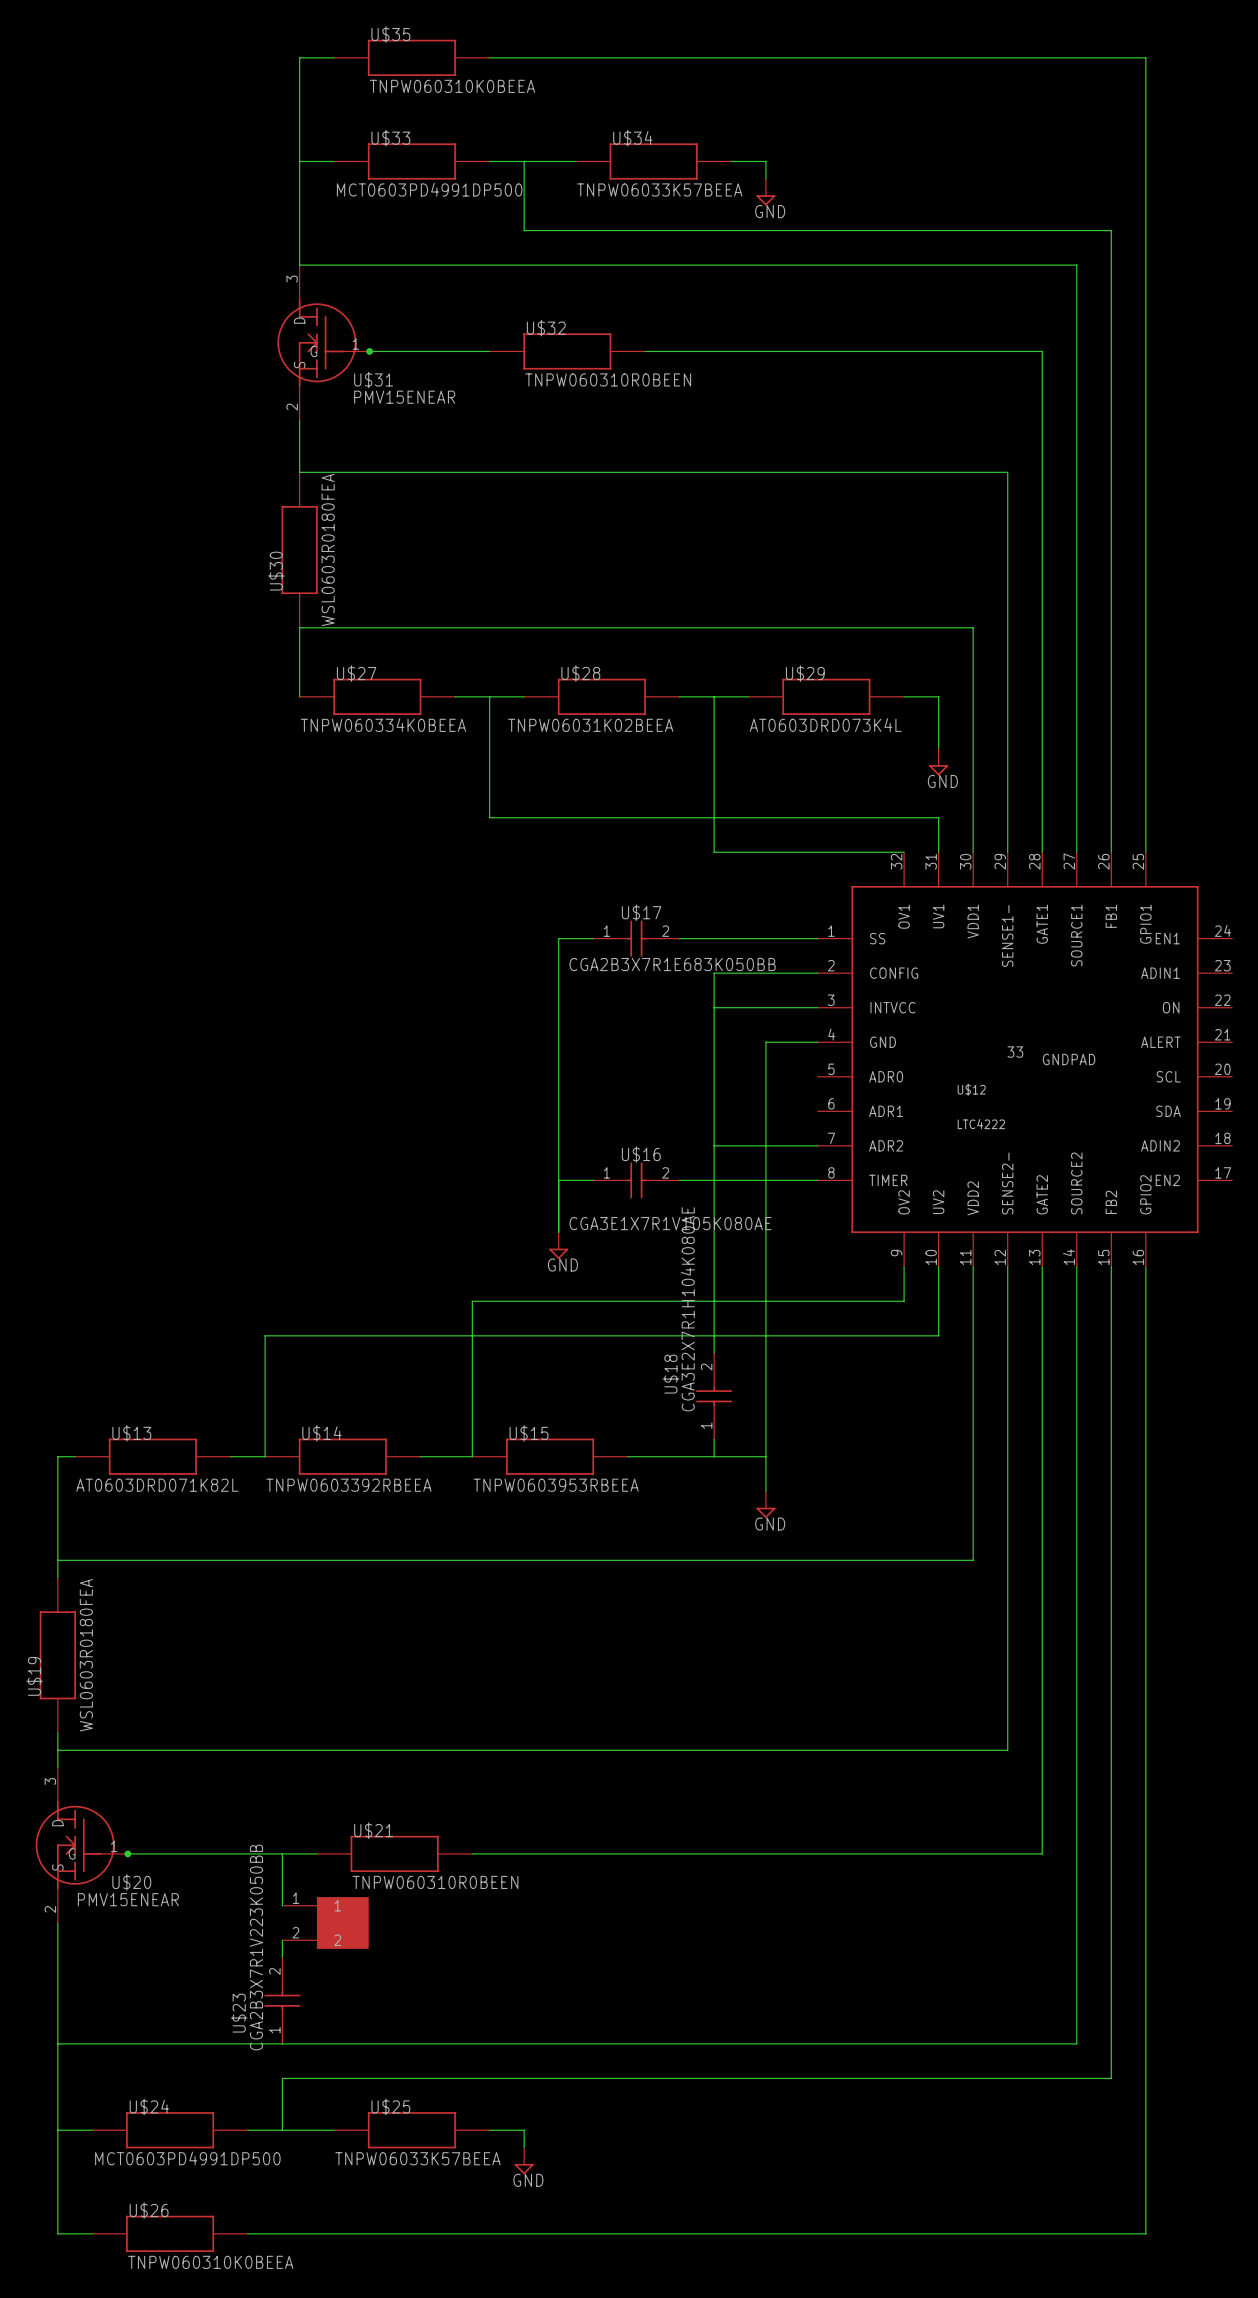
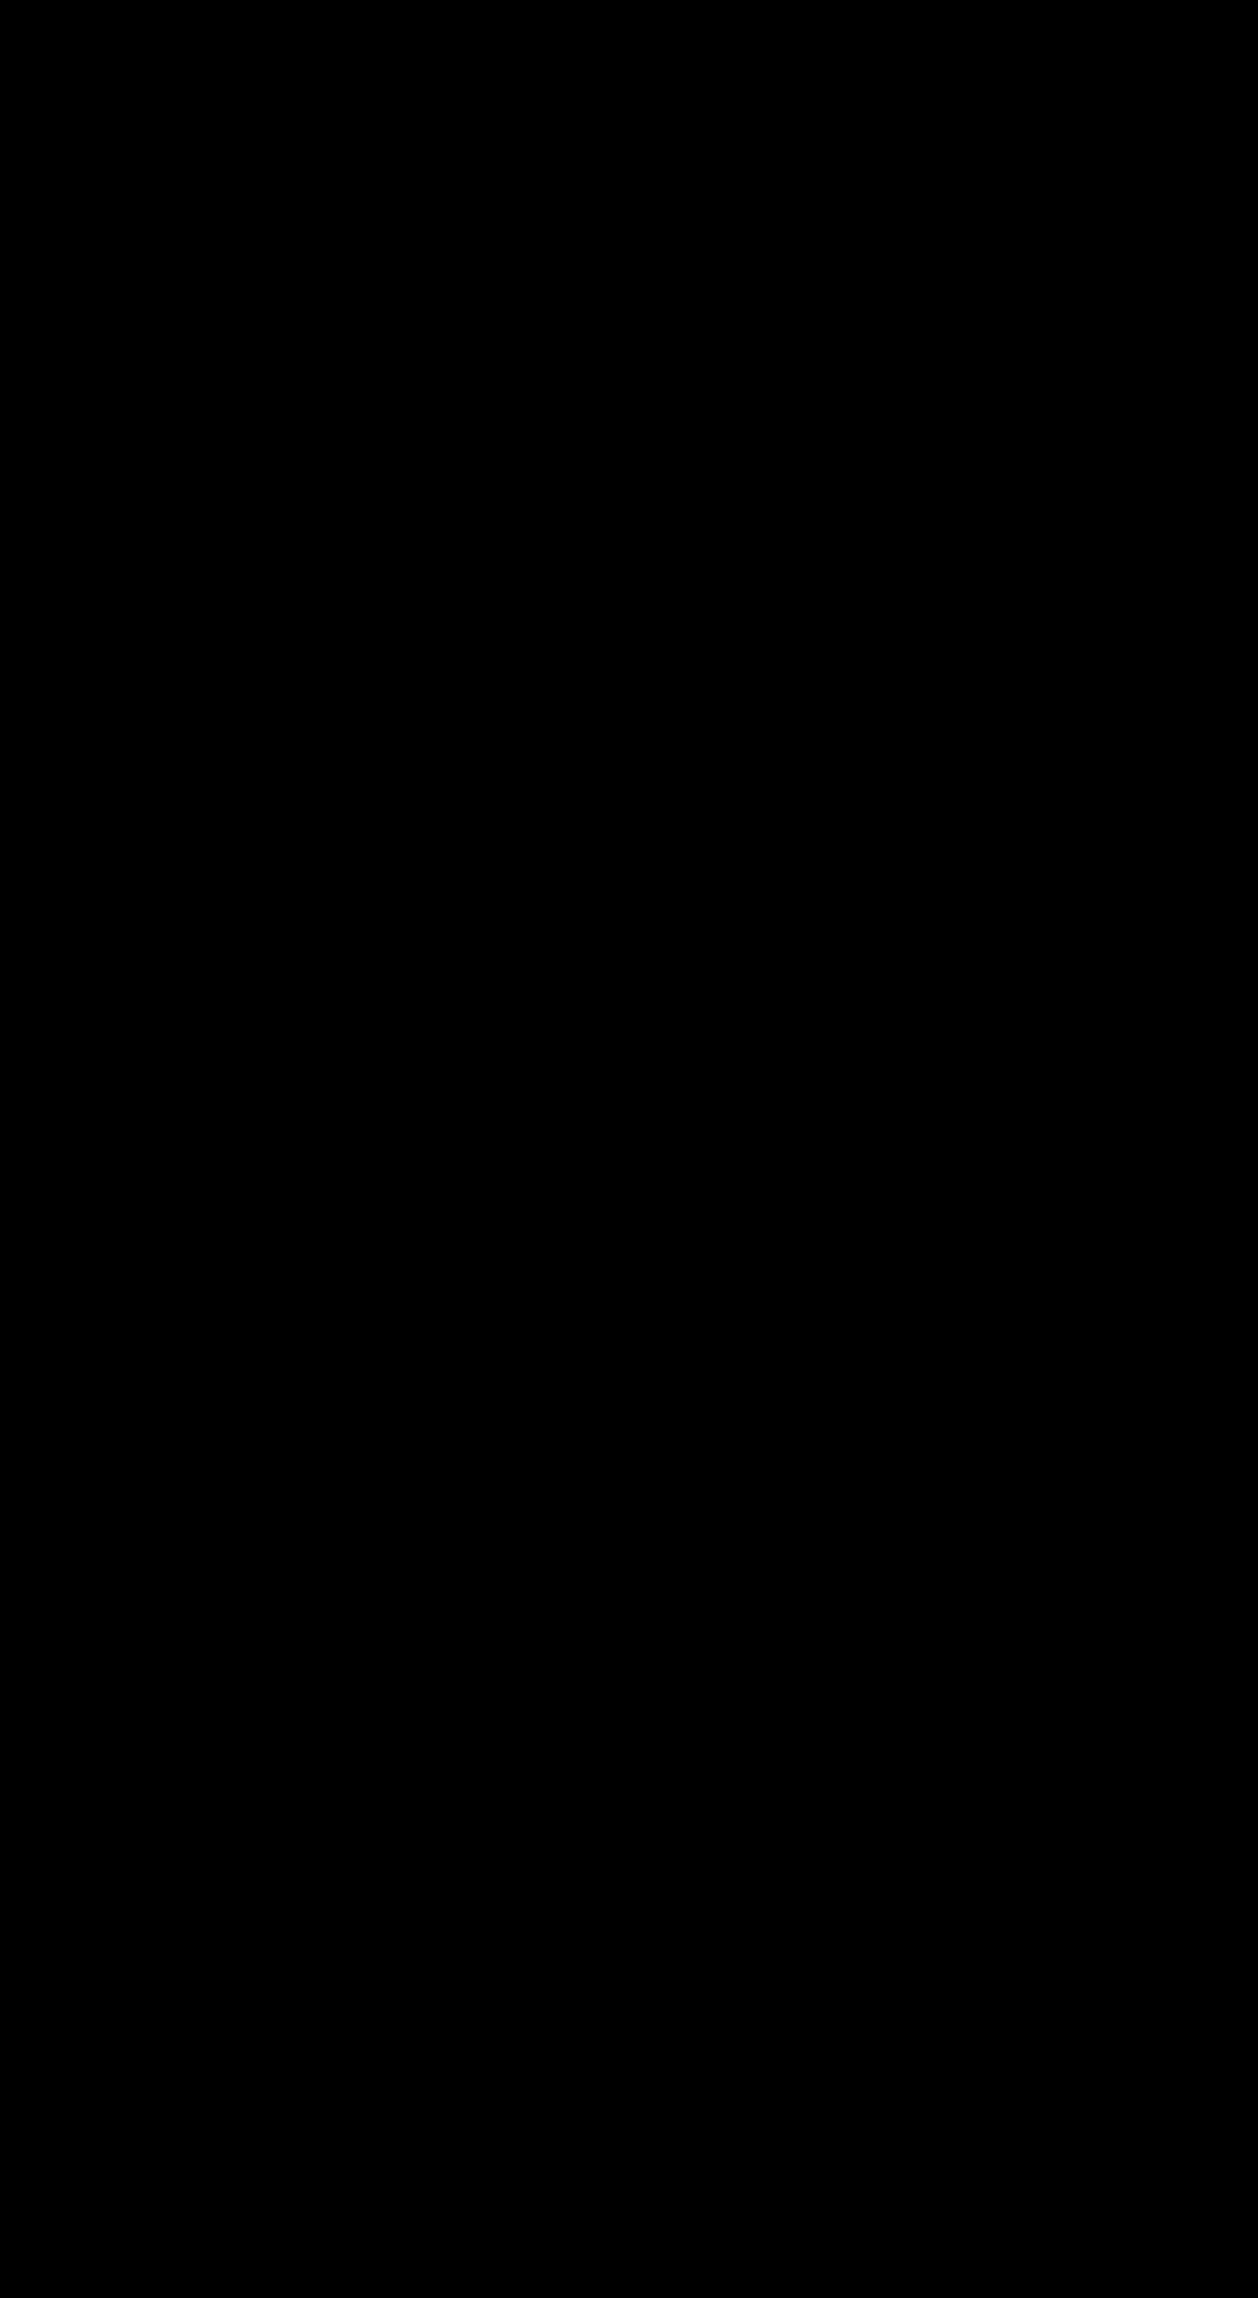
wire: (334, 57) (299, 57) (299, 265) (1076, 265) (1076, 852) -> none
U$35: TNPW060310K0BEEA (411, 57) -> none
wire: (489, 57) (1145, 57) (1145, 852) -> none
wire: (299, 161) (334, 161) -> none
U$33: MCT0603PD4991DP500 (411, 161) -> none
wire: (489, 161) (575, 161) -> none
wire: (524, 161) (524, 230) (1111, 230) (1111, 852) -> none
U$34: TNPW06033K57BEEA (653, 161) -> none
wire: (731, 161) (765, 161) (765, 178) -> none
power symbol: GND (765, 192) -> none
U$31: PMV15ENEAR (323, 342) -> none
wire: (368, 351) (489, 351) -> none
junction: (369, 351) -> none
U$32: TNPW060310R0BEEN (567, 351) -> none
wire: (645, 351) (1042, 351) (1042, 852) -> none
wire: (299, 420) (299, 472) (1007, 472) (1007, 852) -> none
U$30: WSL0603R0180FEA (299, 550) -> none
wire: (299, 696) (299, 627) (973, 627) (973, 852) -> none
U$27: TNPW060334K0BEEA (377, 696) -> none
wire: (455, 696) (524, 696) -> none
wire: (489, 696) (489, 817) (938, 817) (938, 852) -> none
U$28: TNPW06031K02BEEA (601, 696) -> none
wire: (679, 696) (748, 696) -> none
wire: (714, 696) (714, 852) (904, 852) -> none
U$29: AT0603DRD073K4L (826, 696) -> none
wire: (904, 696) (938, 696) (938, 748) -> none
power symbol: GND (938, 762) -> none
wire: (593, 938) (558, 938) (558, 1232) -> none
U$17: CGA2B3X7R1E683K050BB (636, 938) -> none
wire: (679, 938) (817, 938) -> none
wire: (817, 973) (714, 973) (714, 1353) -> none
wire: (714, 1007) (817, 1007) -> none
wire: (817, 1042) (765, 1042) (765, 1491) -> none
U$12: LTC4222 (1024, 1059) -> none
wire: (714, 1145) (817, 1145) -> none
wire: (558, 1180) (593, 1180) -> none
U$16: CGA3E1X7R1V105K080AE (636, 1180) -> none
wire: (679, 1180) (817, 1180) -> none
power symbol: GND (558, 1245) -> none
wire: (904, 1266) (904, 1301) (472, 1301) (472, 1456) (420, 1456) -> none
wire: (938, 1266) (938, 1335) (265, 1335) (265, 1456) (230, 1456) -> none
wire: (973, 1266) (973, 1560) (57, 1560) -> none
wire: (1007, 1266) (1007, 1750) (57, 1750) -> none
wire: (1042, 1266) (1042, 1853) (472, 1853) -> none
wire: (1076, 1266) (1076, 2043) (57, 2043) -> none
wire: (1111, 1266) (1111, 2078) (282, 2078) (282, 2130) -> none
wire: (1145, 1266) (1145, 2233) (247, 2233) -> none
U$18: CGA3E2X7R1H104K080AE (714, 1396) -> none
wire: (714, 1439) (714, 1456) -> none
wire: (75, 1456) (57, 1456) (57, 1577) -> none
U$13: AT0603DRD071K82L (152, 1456) -> none
U$14: TNPW0603392RBEEA (342, 1456) -> none
U$15: TNPW0603953RBEEA (550, 1456) -> none
wire: (627, 1456) (765, 1456) -> none
power symbol: GND (765, 1504) -> none
U$19: WSL0603R0180FEA (57, 1655) -> none
wire: (57, 1733) (57, 1767) -> none
U$20: PMV15ENEAR (81, 1845) -> none
wire: (126, 1853) (316, 1853) -> none
junction: (127, 1853) -> none
wire: (282, 1853) (282, 1905) -> none
U$21: TNPW060310R0BEEN (394, 1853) -> none
wire: (57, 1923) (57, 2233) (92, 2233) -> none
part: (325, 1923) -> none
wire: (282, 1940) (282, 1957) -> none
U$23: CGA2B3X7R1V223K050BB (282, 2000) -> none
wire: (57, 2130) (92, 2130) -> none
U$24: MCT0603PD4991DP500 (170, 2130) -> none
wire: (247, 2130) (334, 2130) -> none
U$25: TNPW06033K57BEEA (411, 2130) -> none
wire: (489, 2130) (524, 2130) (524, 2147) -> none
power symbol: GND (524, 2160) -> none
U$26: TNPW060310K0BEEA (170, 2233) -> none

